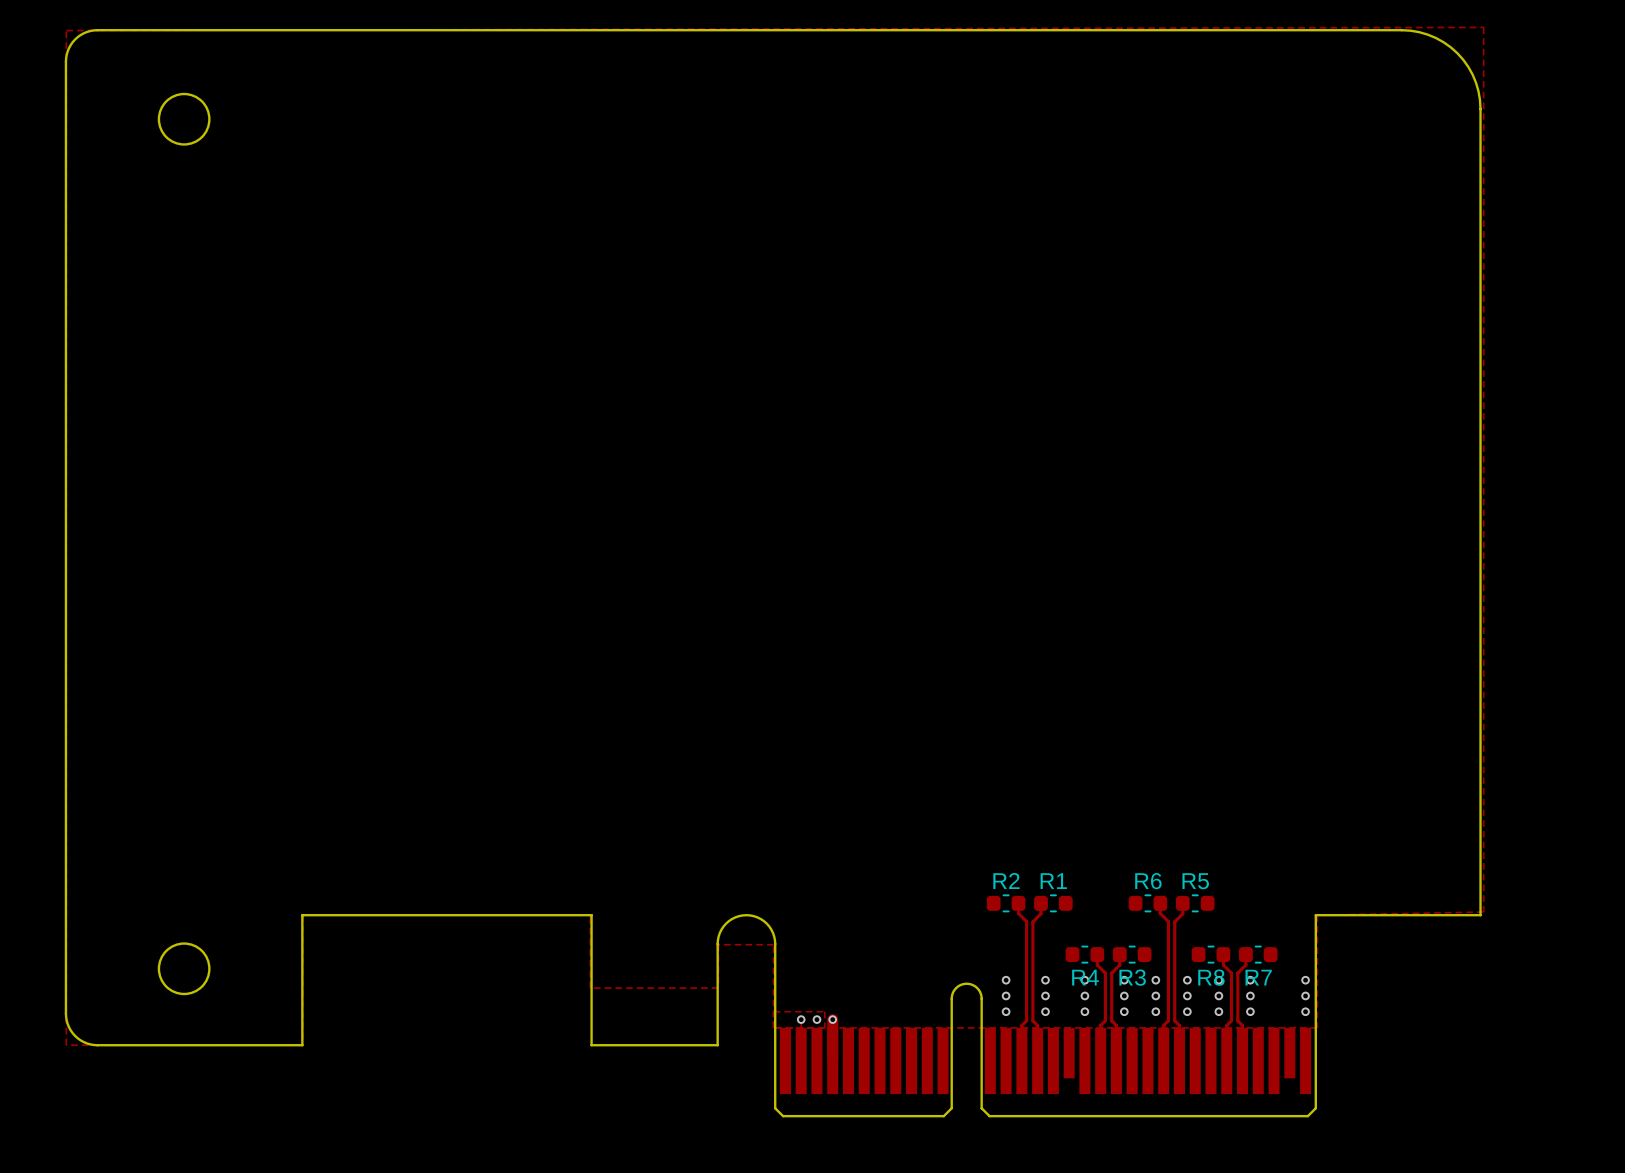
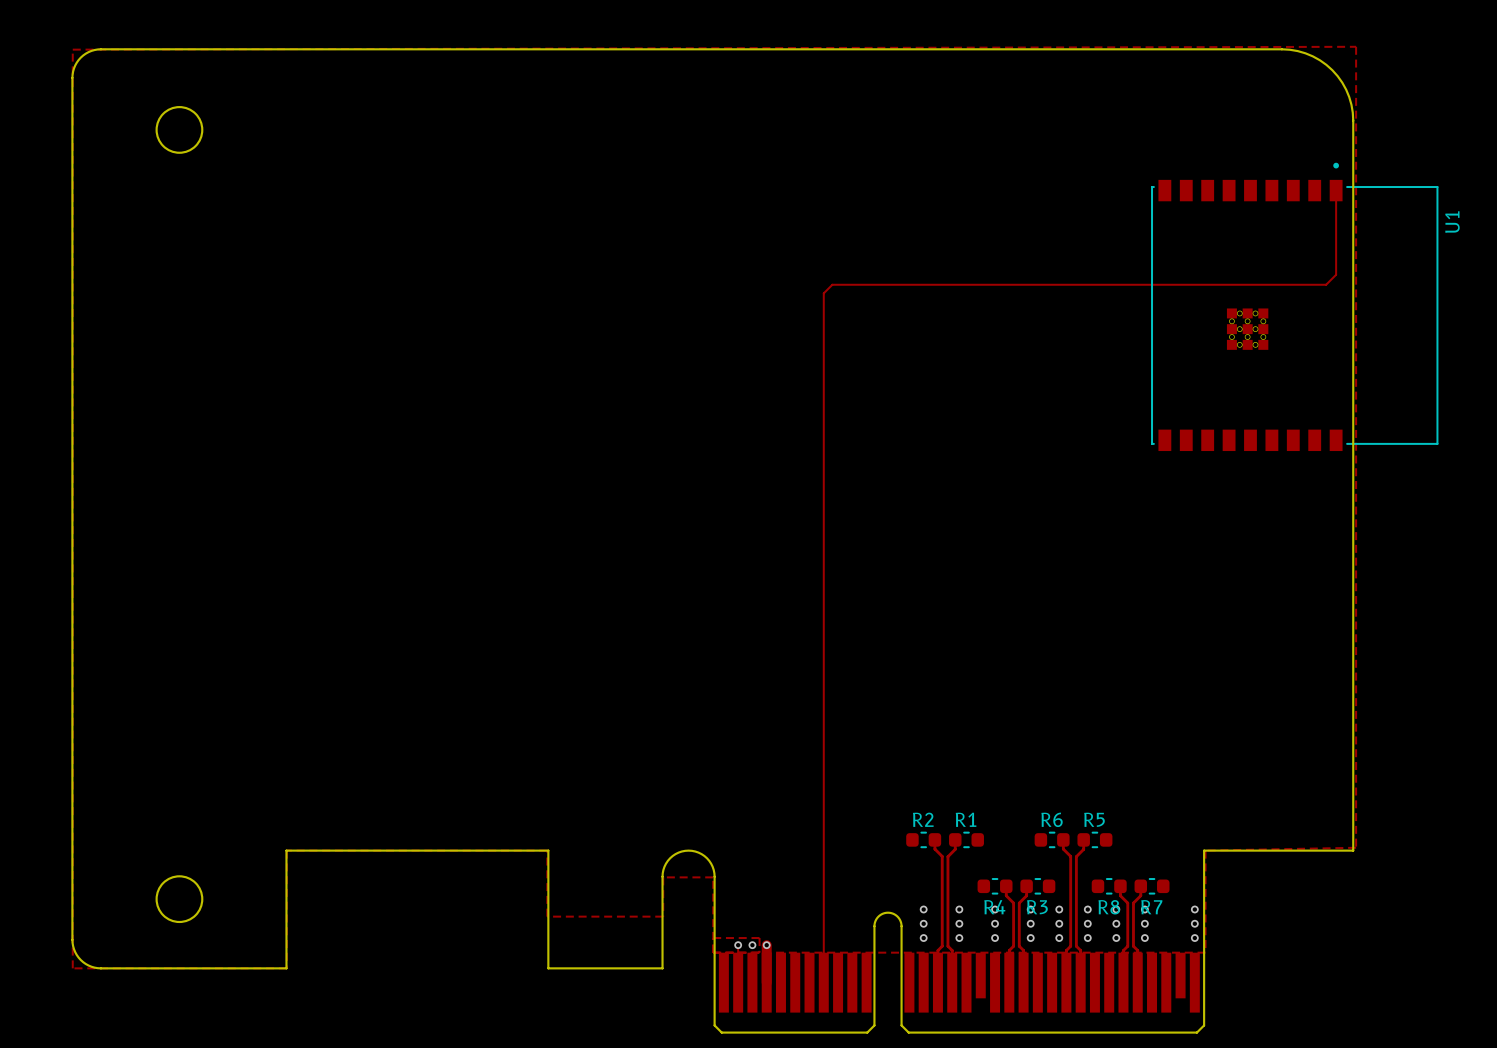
track: none -> (1336, 190) (1336, 274) (1326, 284) (832, 284) (823, 293) (823, 982)
U1: none -> (1294, 306)

